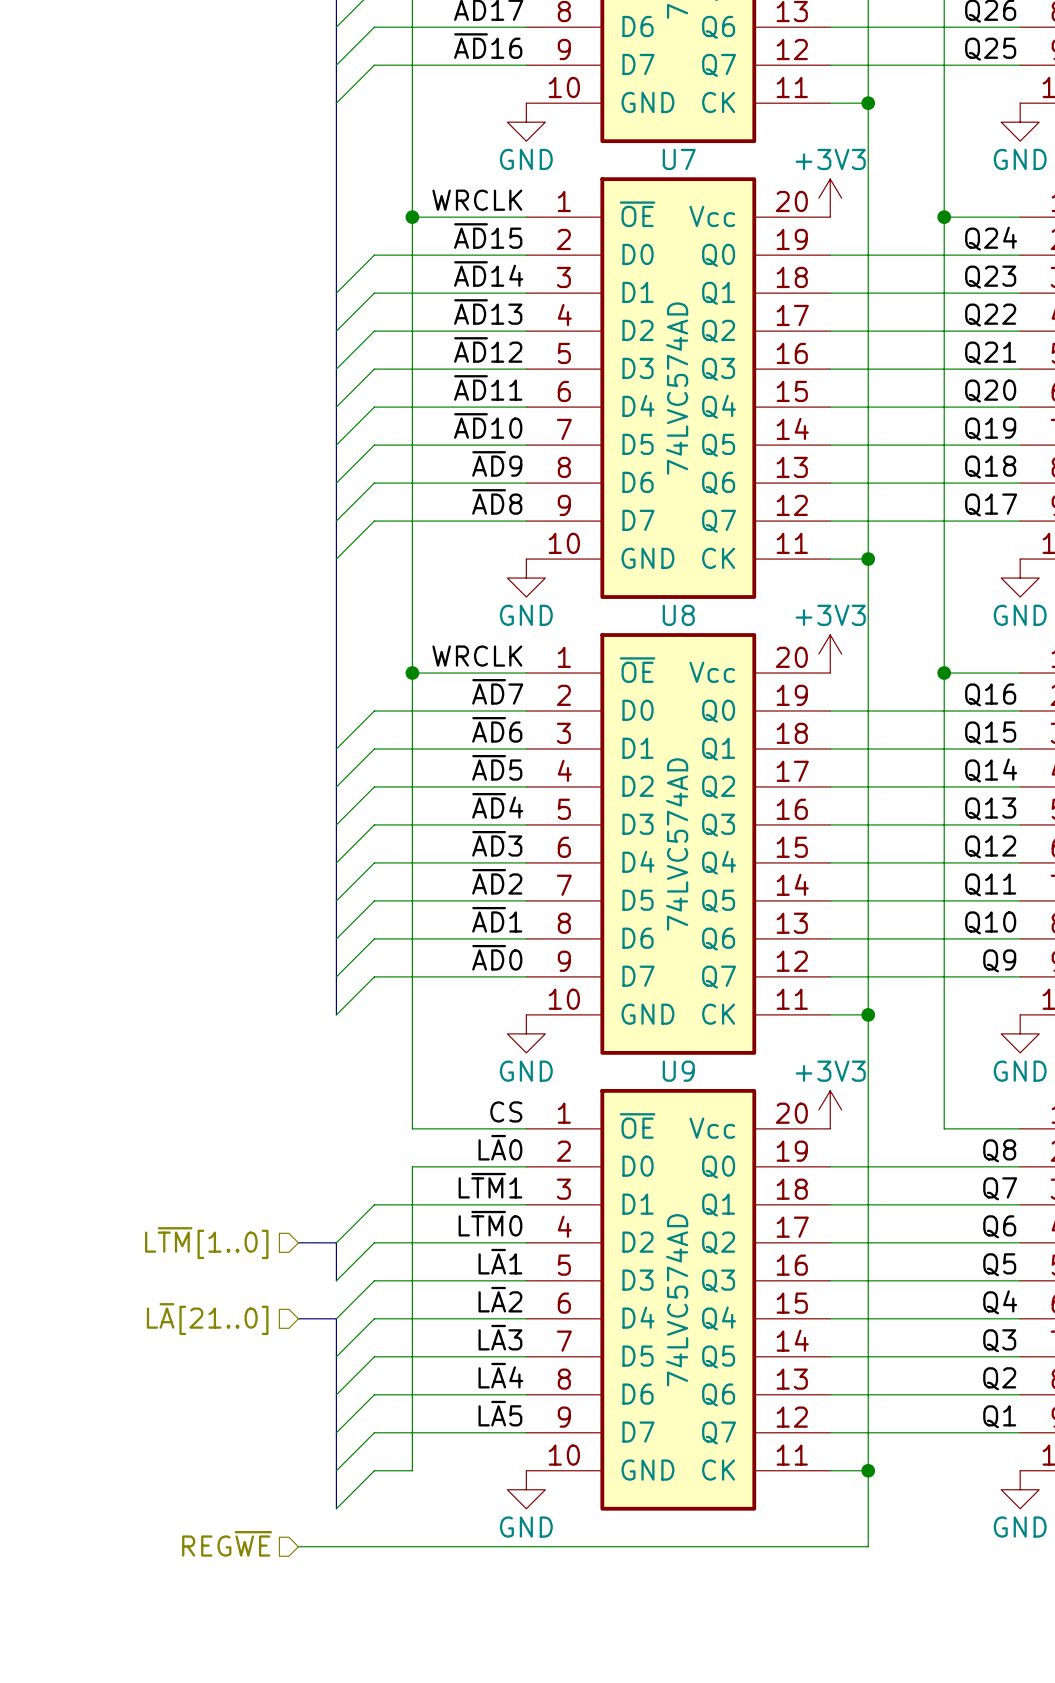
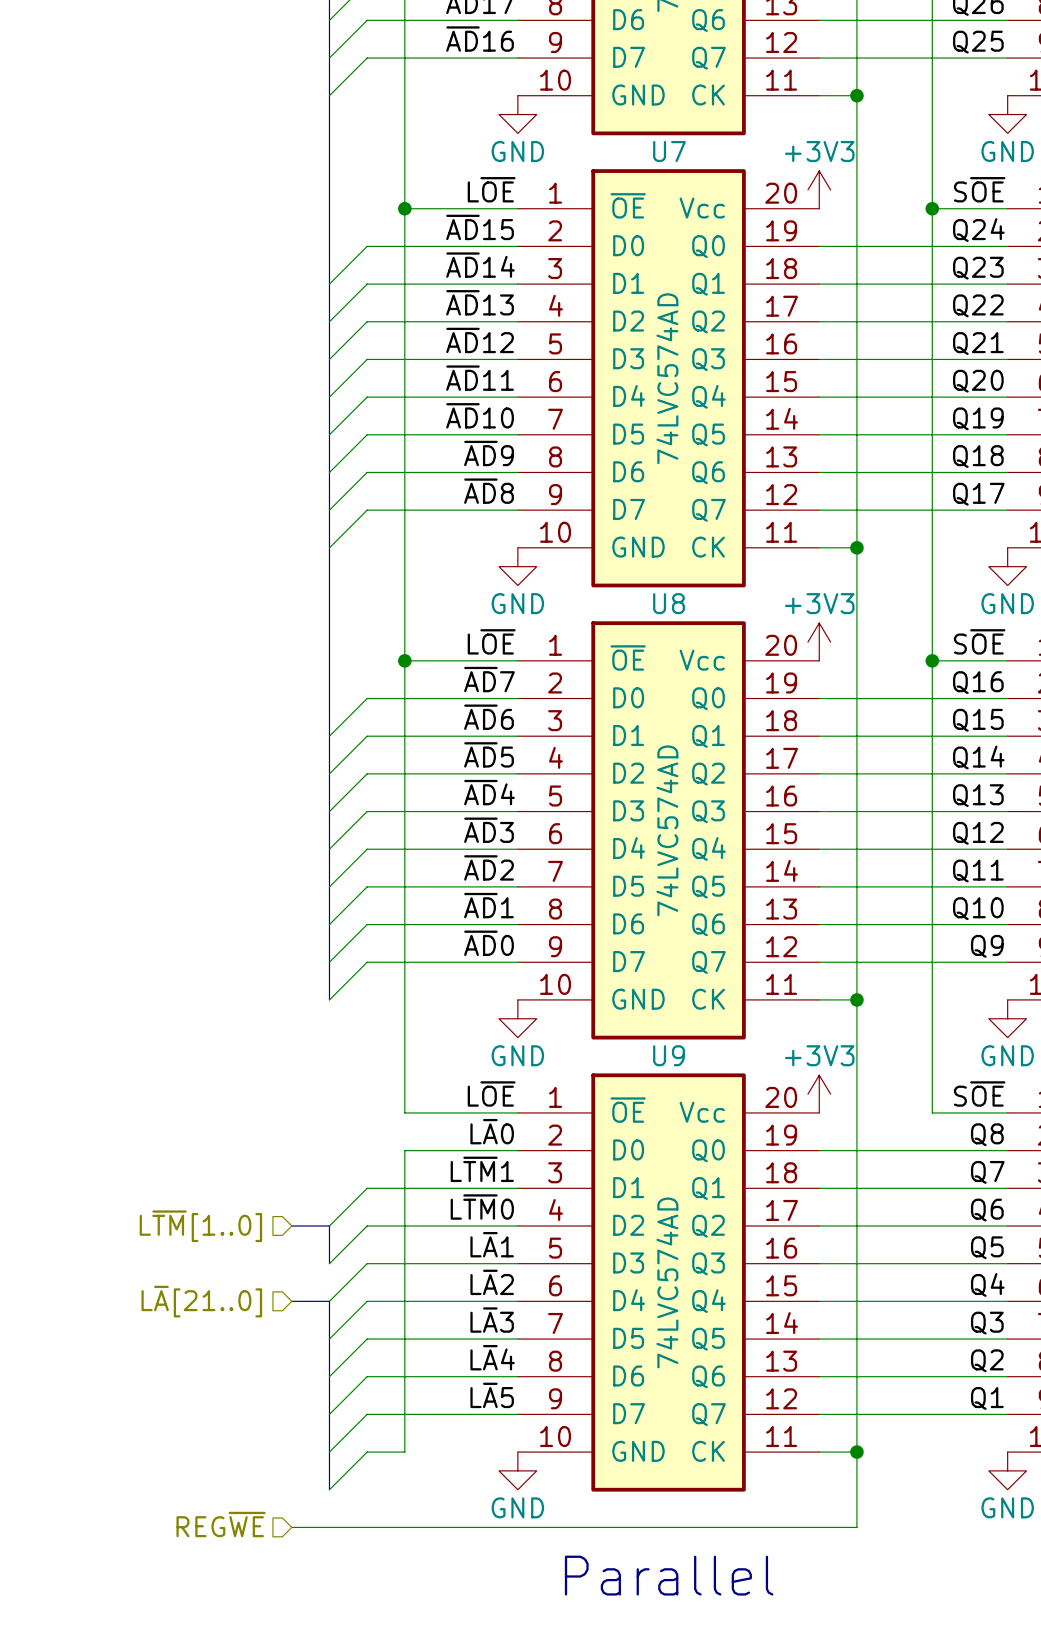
label: none -> S~{OE} (979, 189)
label: WRCLK (477, 200) -> L~{OE} (491, 189)
label: none -> S~{OE} (979, 641)
label: WRCLK (477, 656) -> L~{OE} (491, 641)
label: none -> S~{OE} (979, 1093)
label: CS (506, 1111) -> L~{OE} (491, 1093)
text: none -> Parallel (669, 1575)

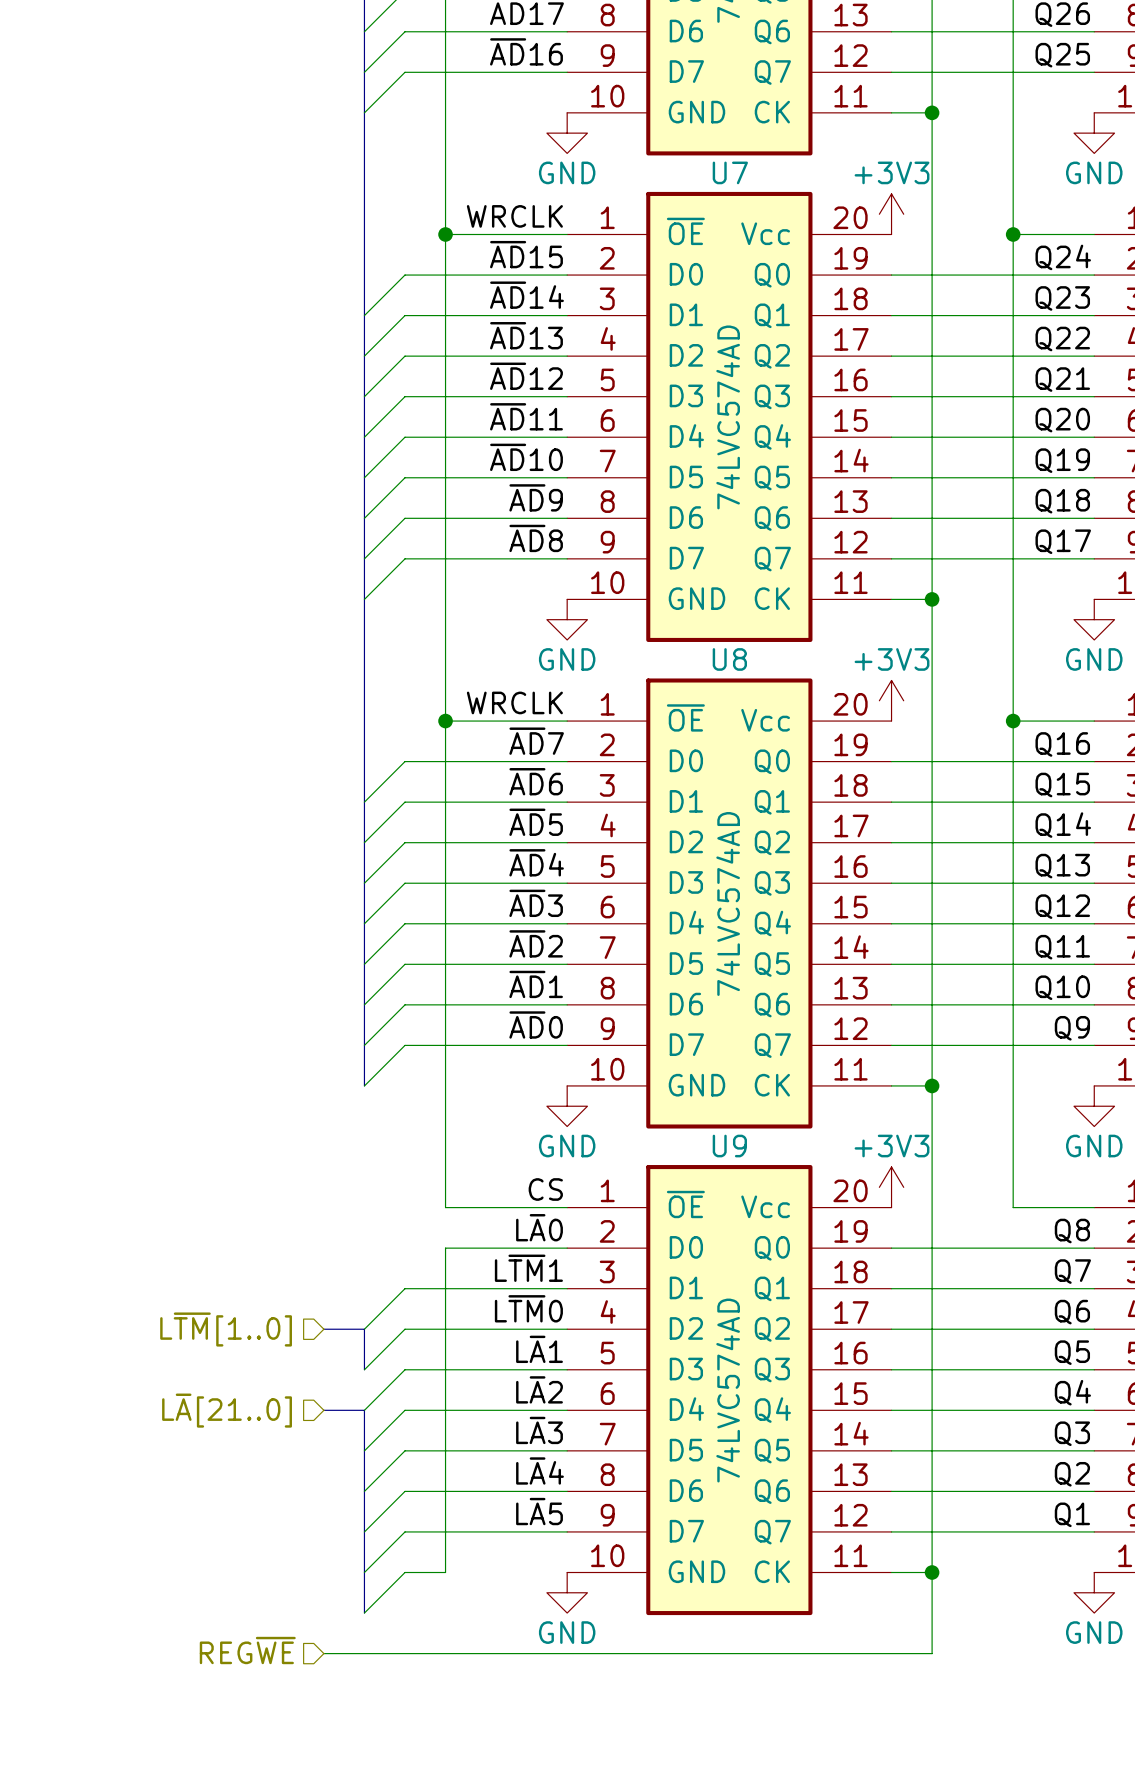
label: L~{OE} (491, 189) -> WRCLK (514, 216)
label: S~{OE} (979, 189) -> none
label: L~{OE} (491, 641) -> WRCLK (514, 702)
label: S~{OE} (979, 641) -> none
label: L~{OE} (491, 1093) -> CS (545, 1189)
label: S~{OE} (979, 1093) -> none
text: Parallel (669, 1575) -> none

